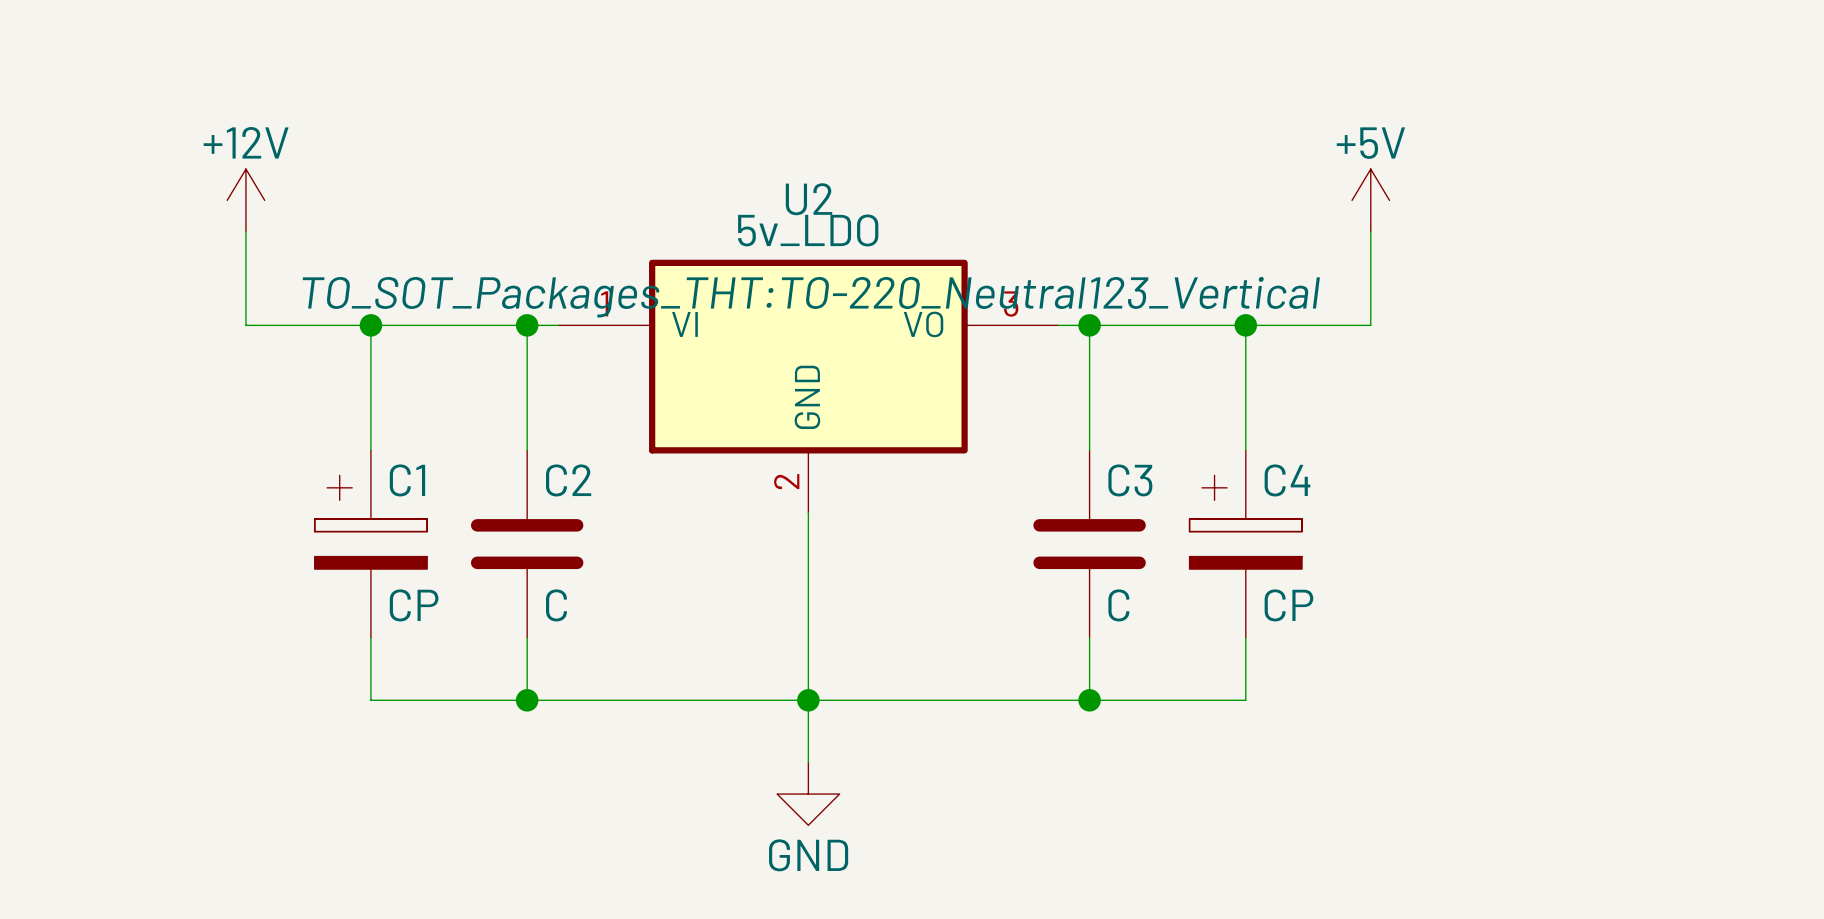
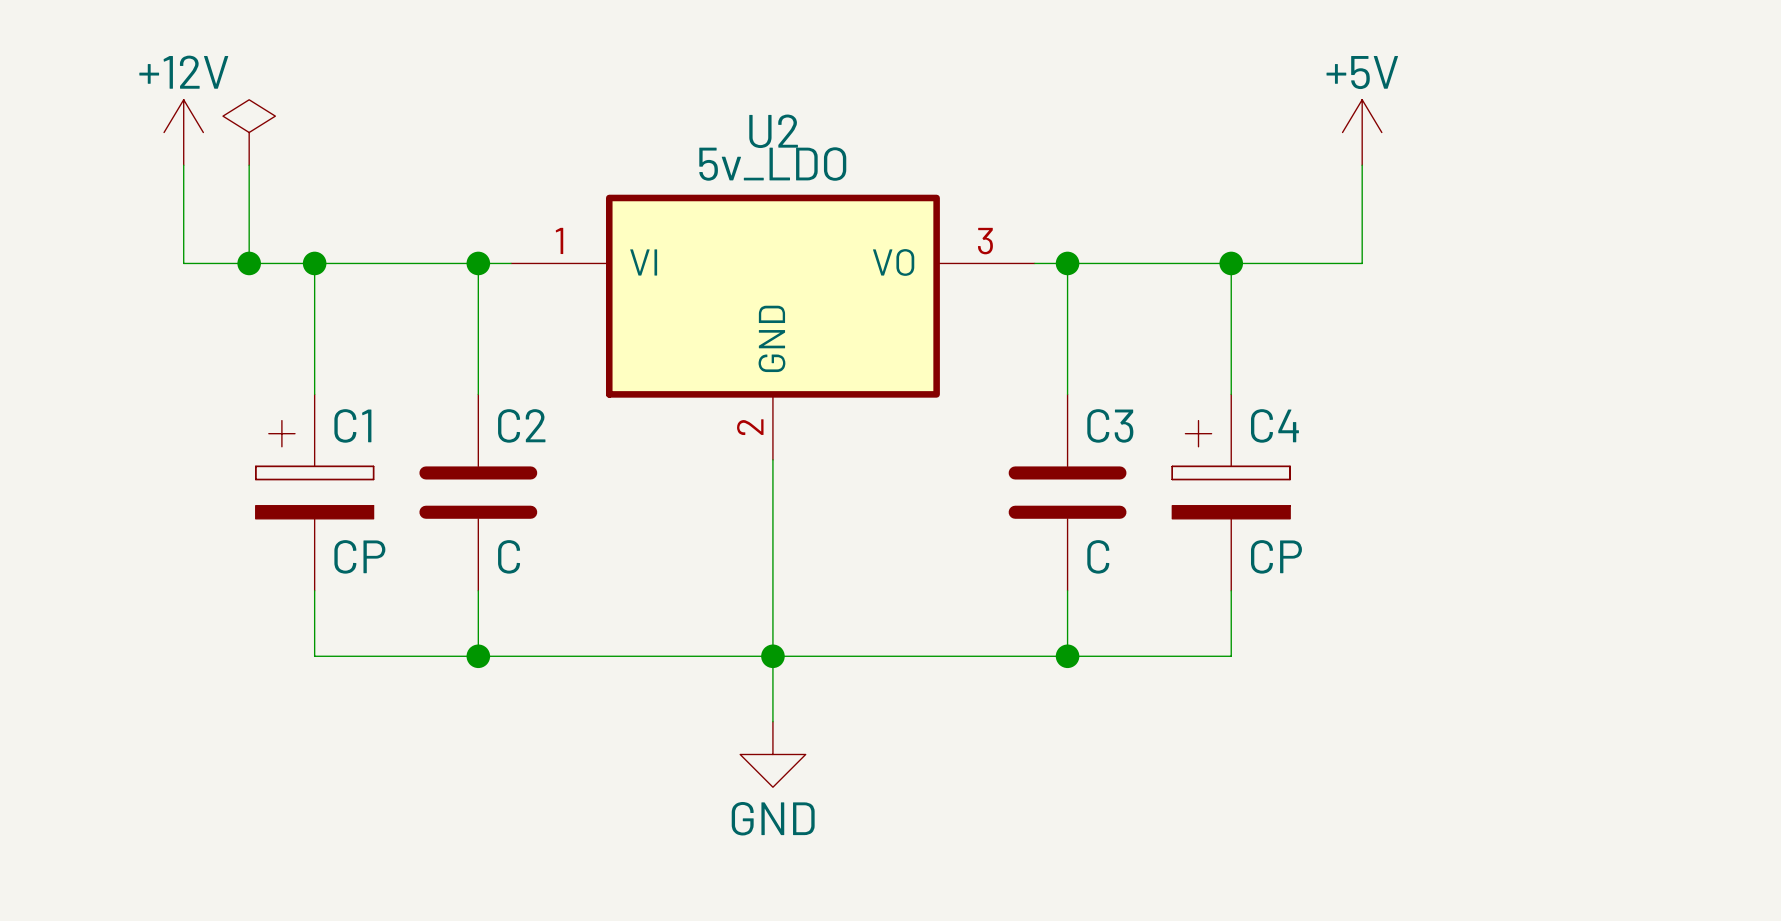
power symbol: none -> (249, 132)
wire: none -> (249, 165) (249, 263)
U2 text: TO_SOT_Packages_THT:TO-220_Neutral123_Vertical (811, 297) -> none
junction: none -> (249, 263)

